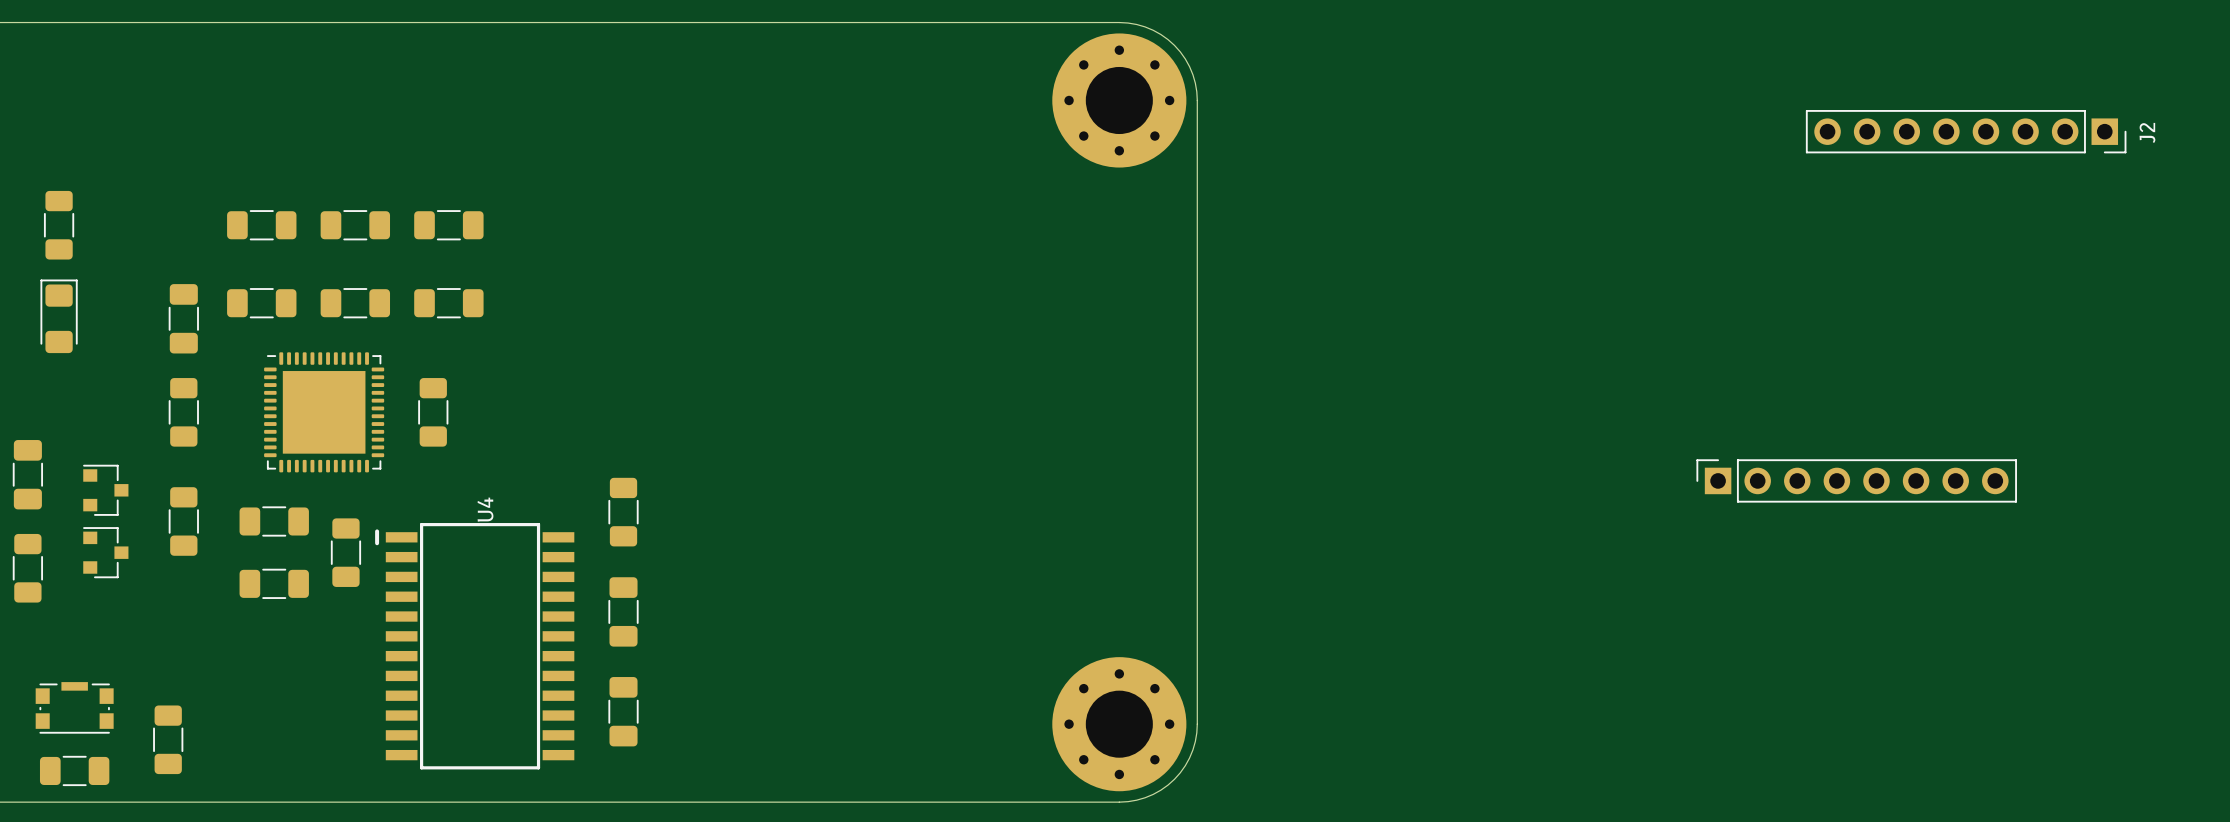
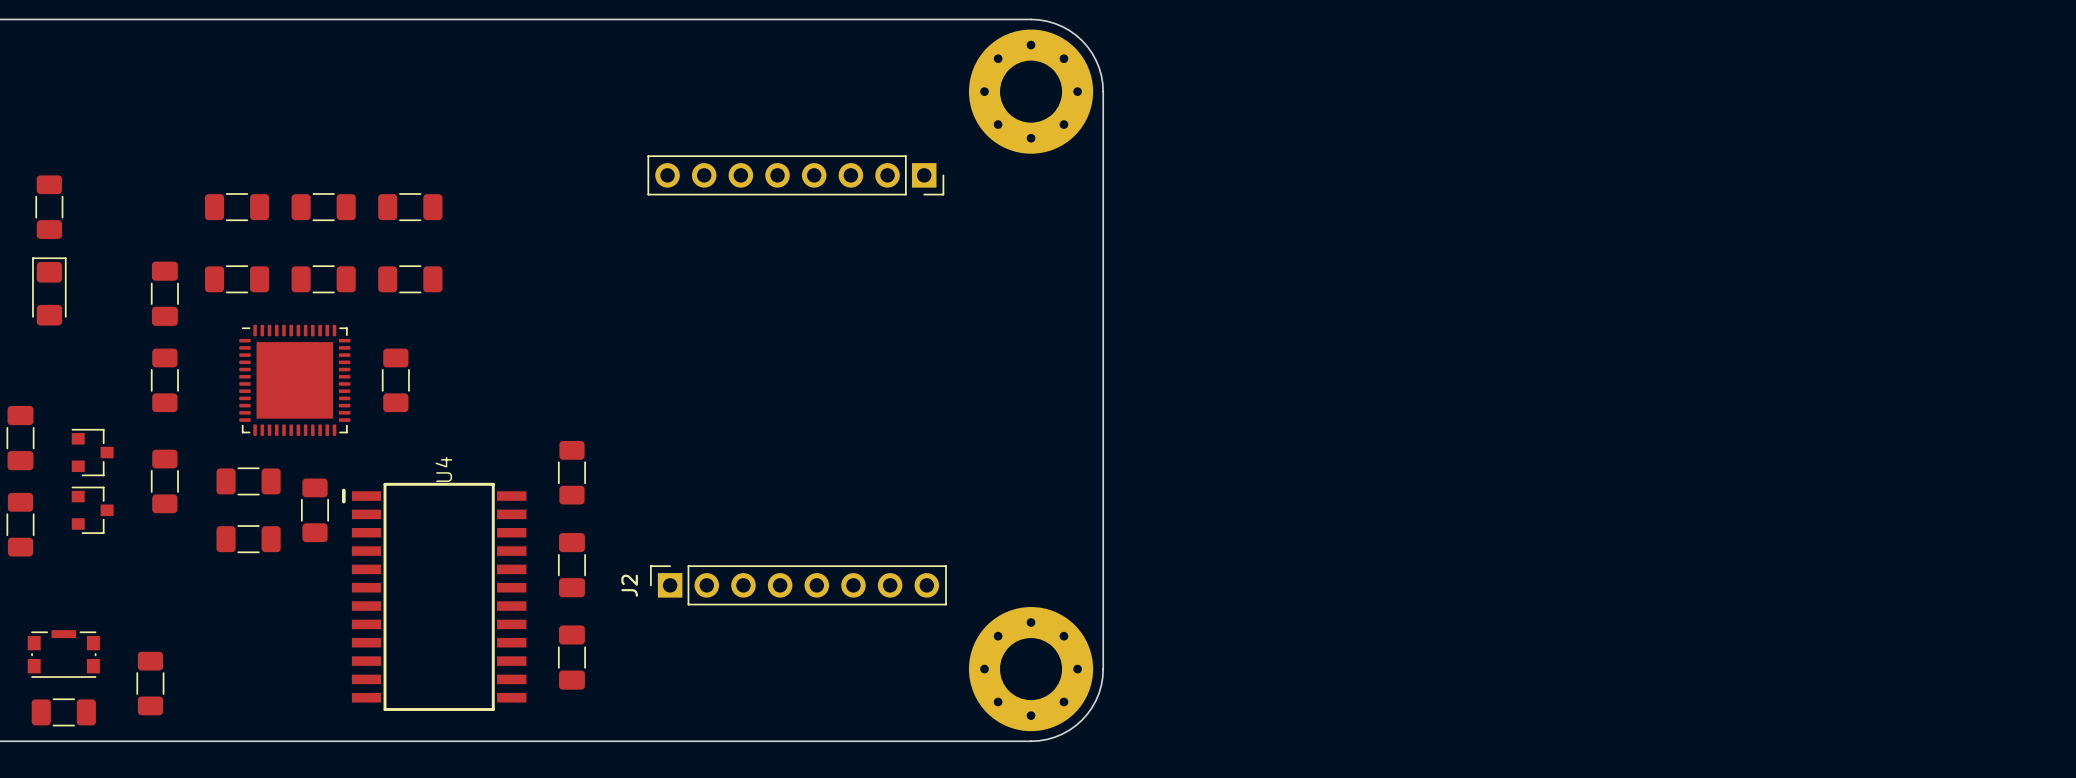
J2 rotation: 0° (1966, 131) -> 180° (798, 585)
J2 position: (1966, 131) -> (798, 585)
part: none -> (795, 175)
part: (1856, 480) -> none

